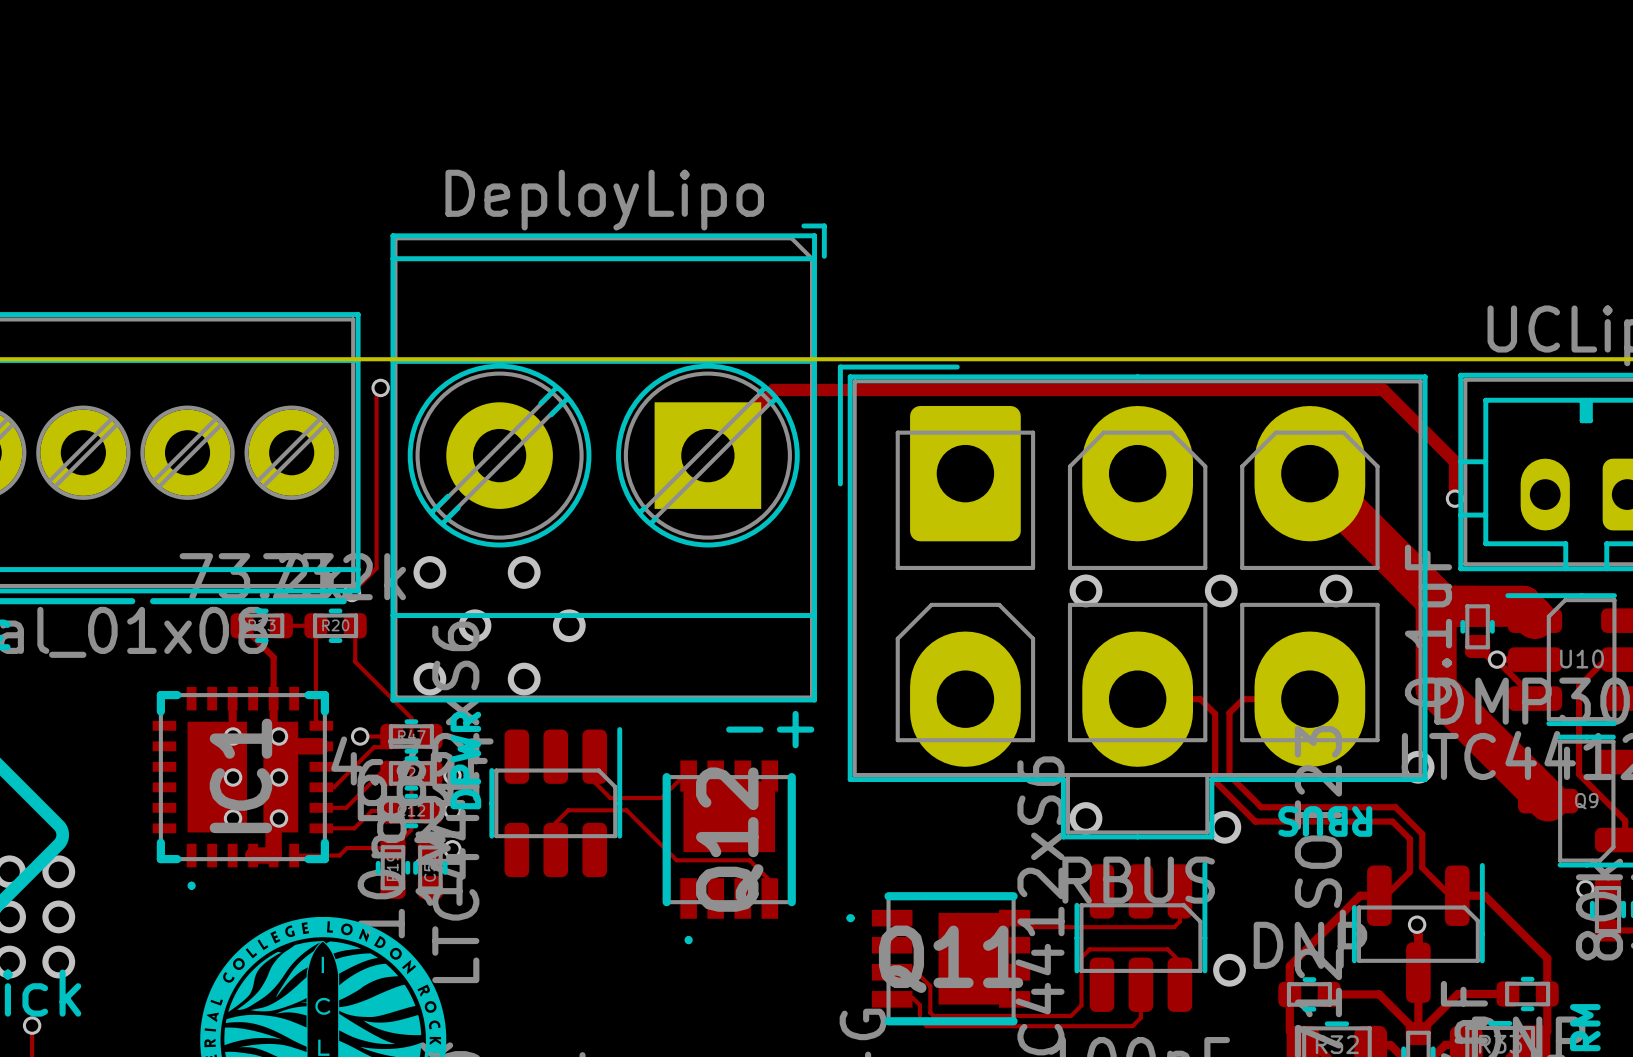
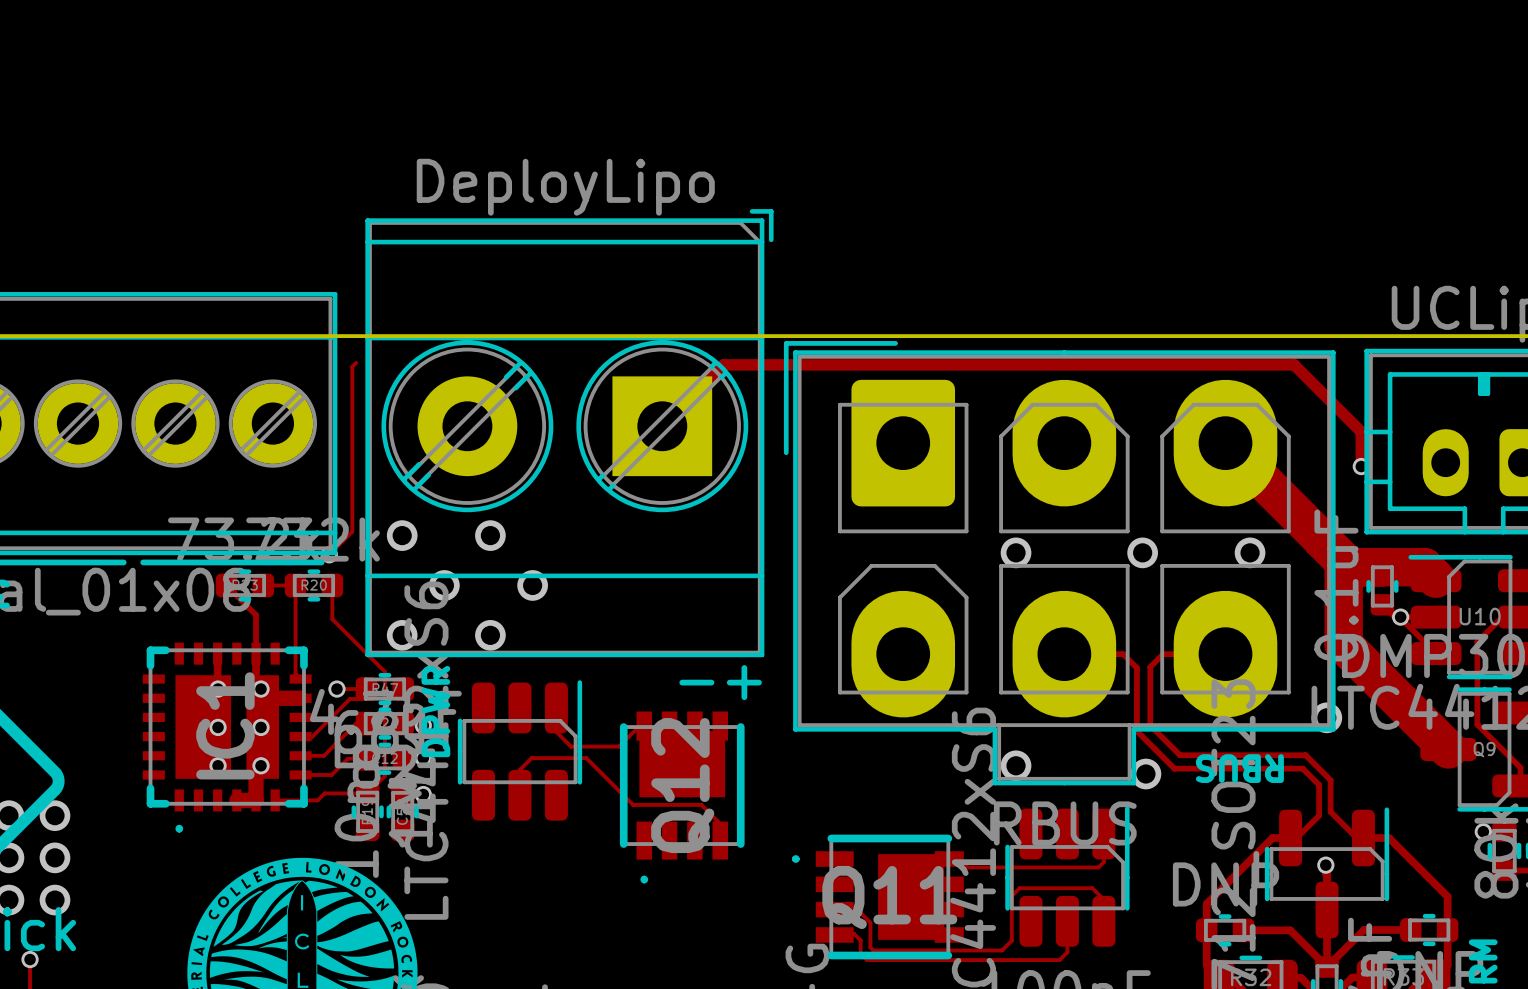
via: (380, 387) -> none
via: (1229, 970) -> none

